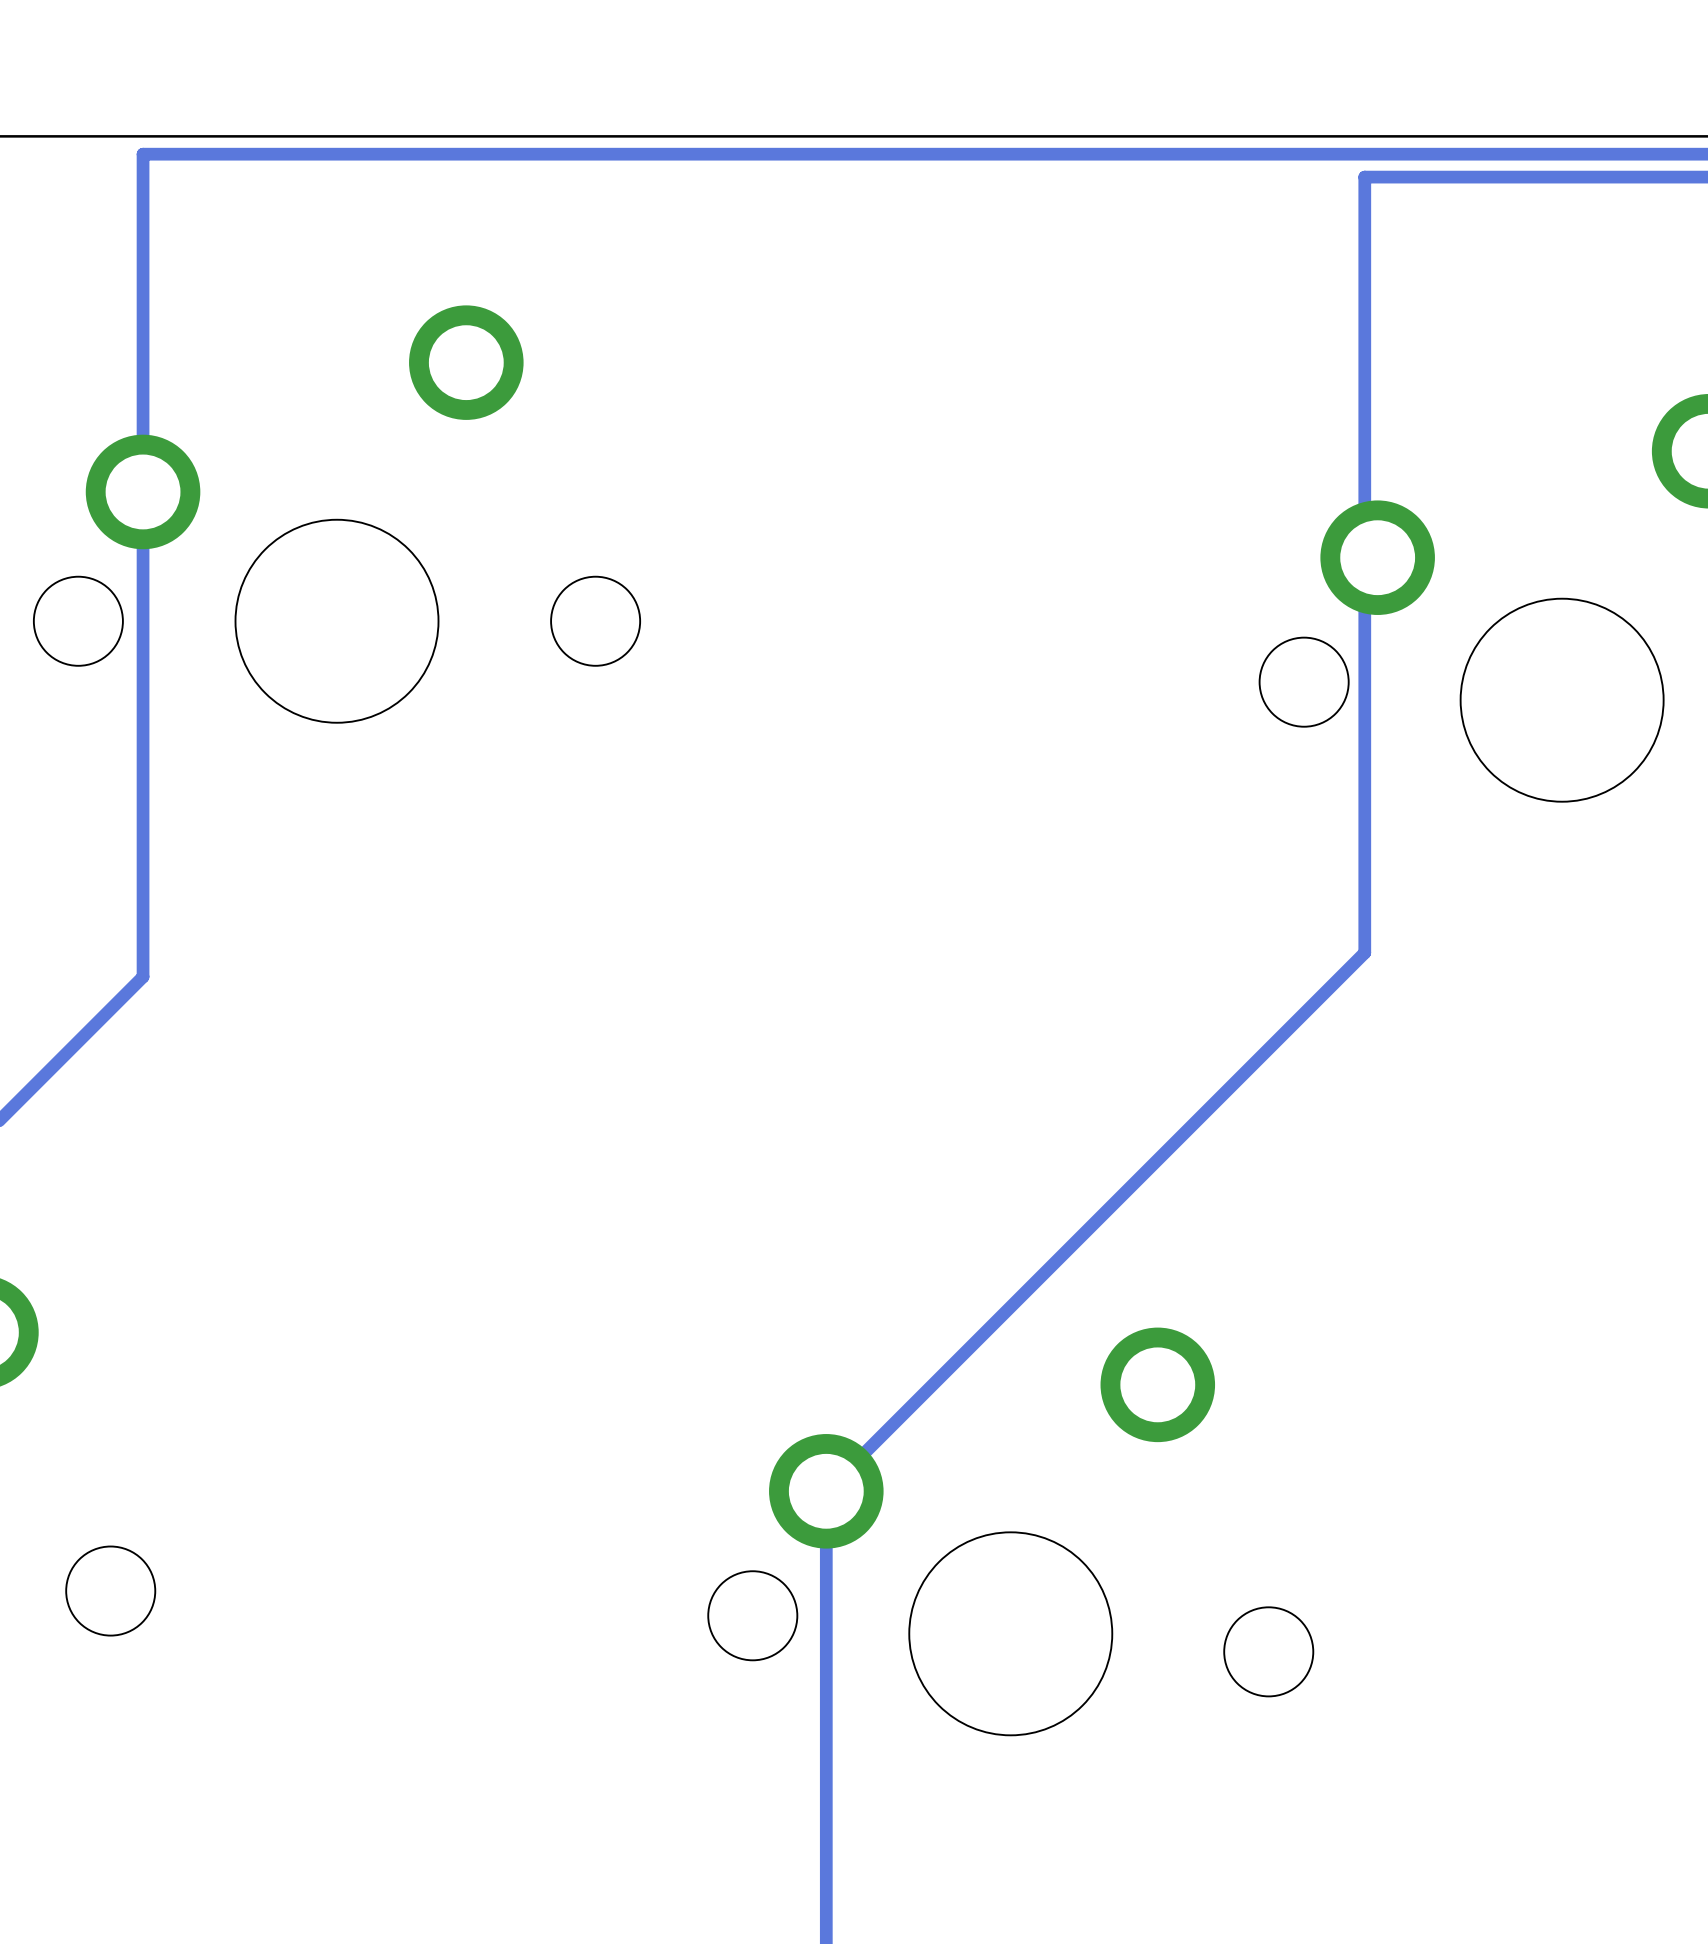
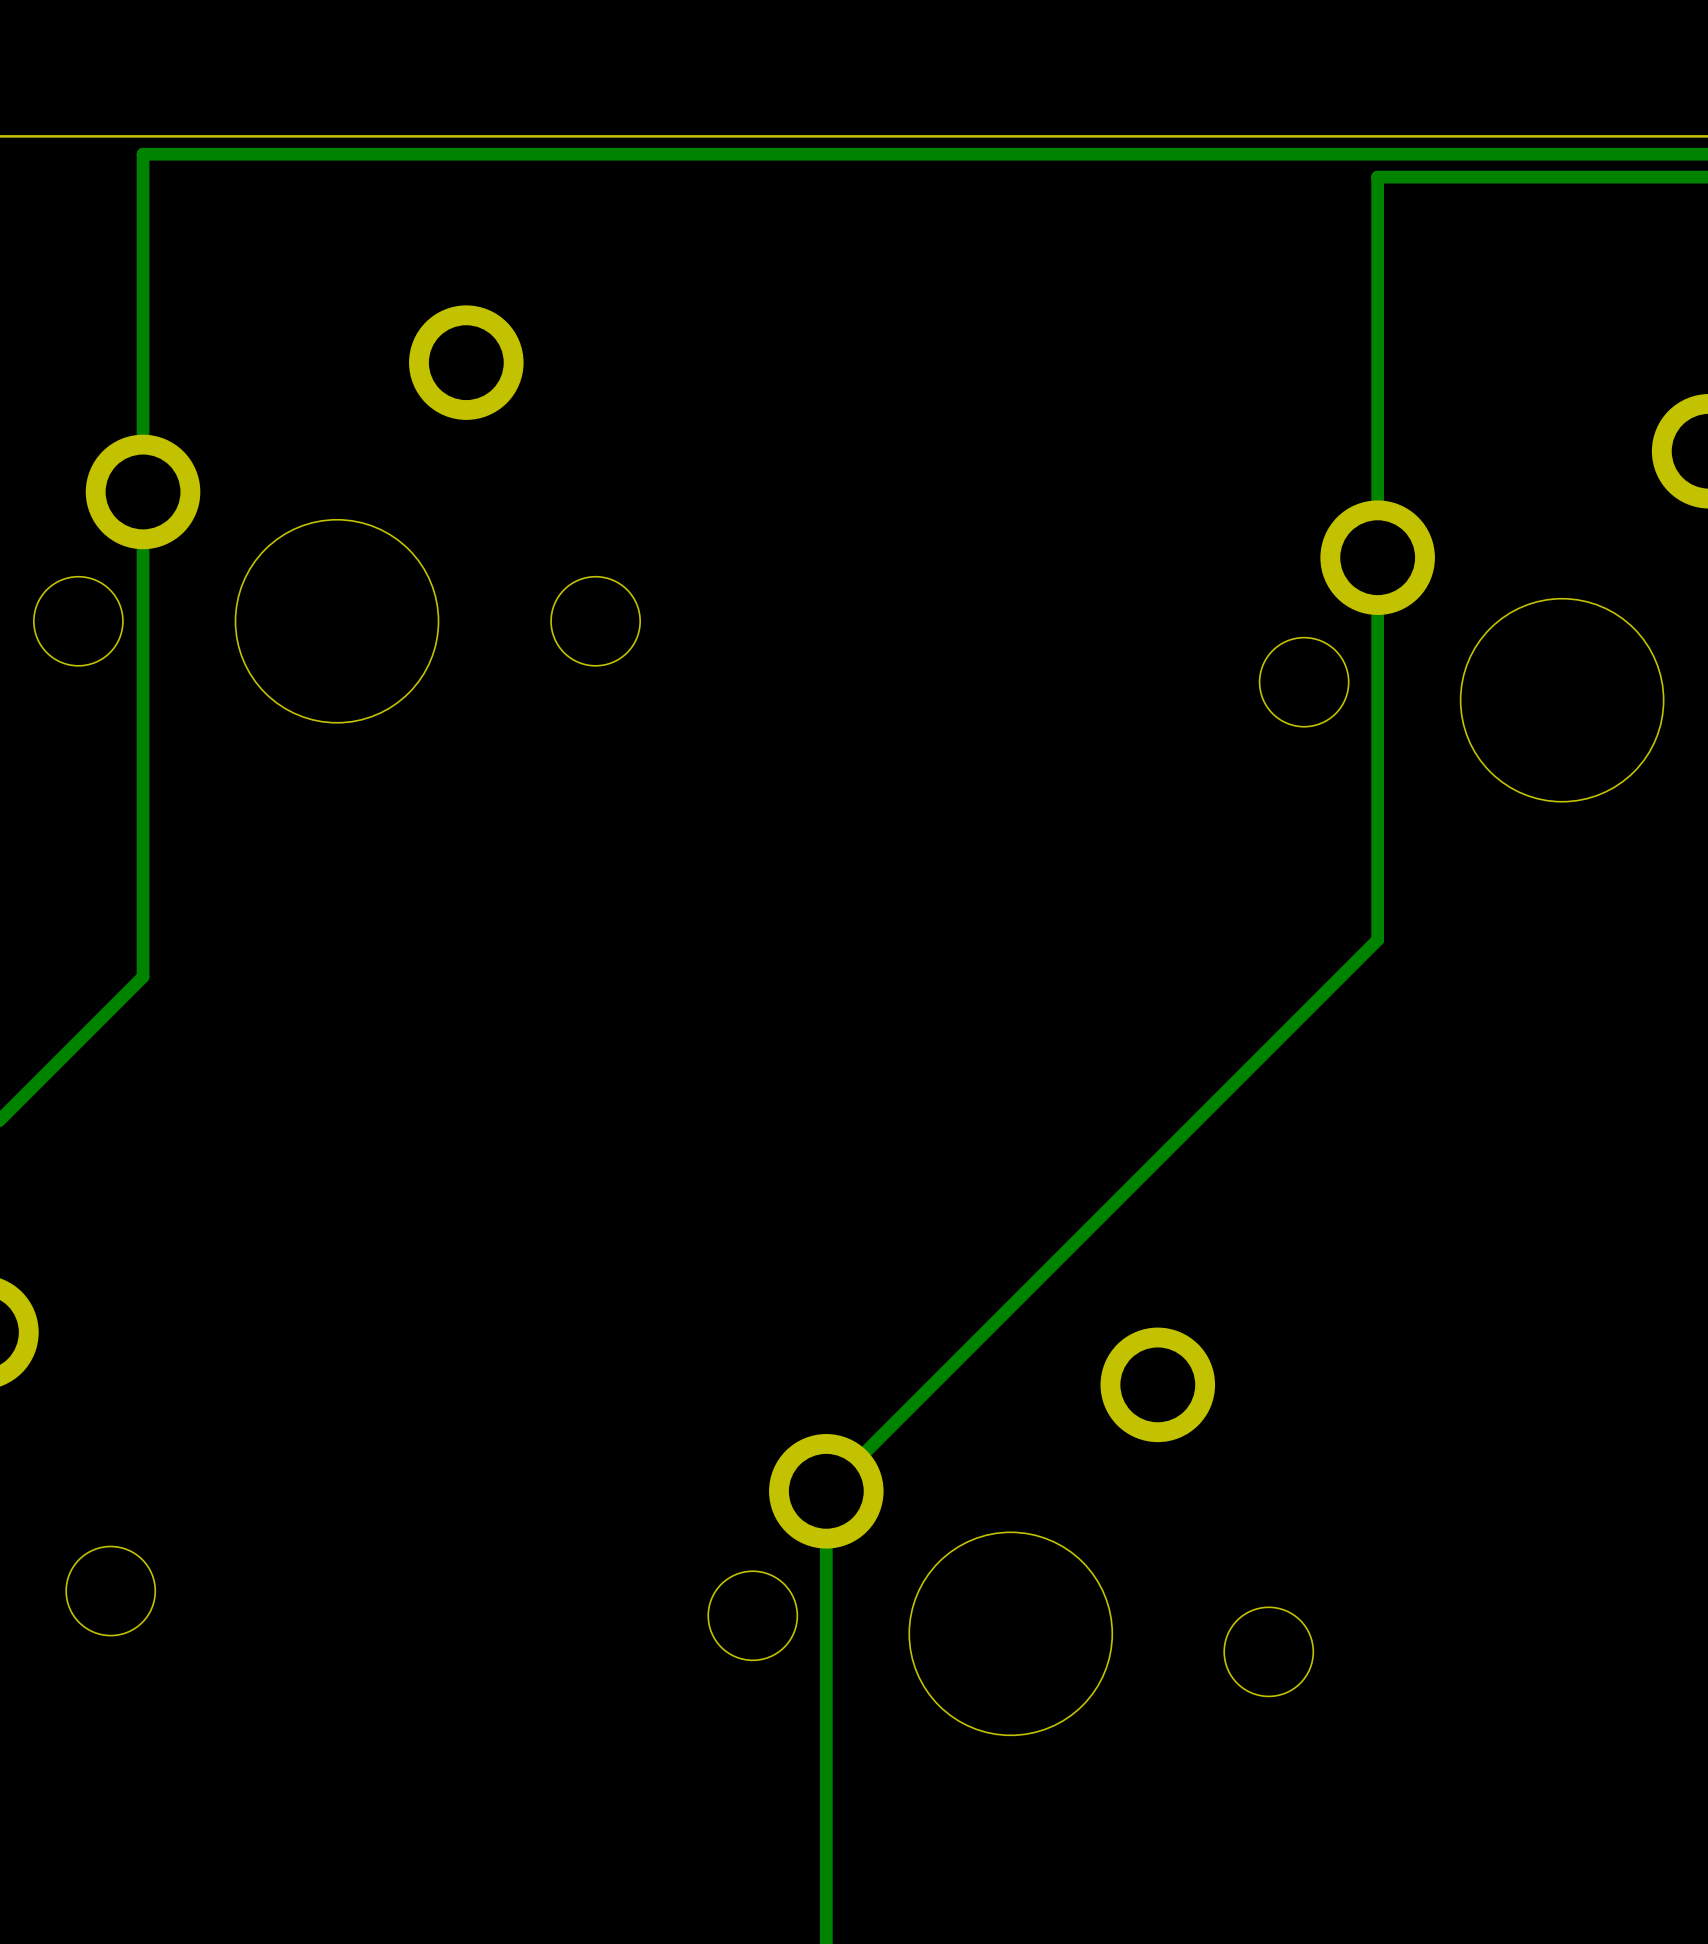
track: (1377, 177) (1364, 177) (1364, 952) -> (1377, 177) (1377, 939) (1364, 952)

